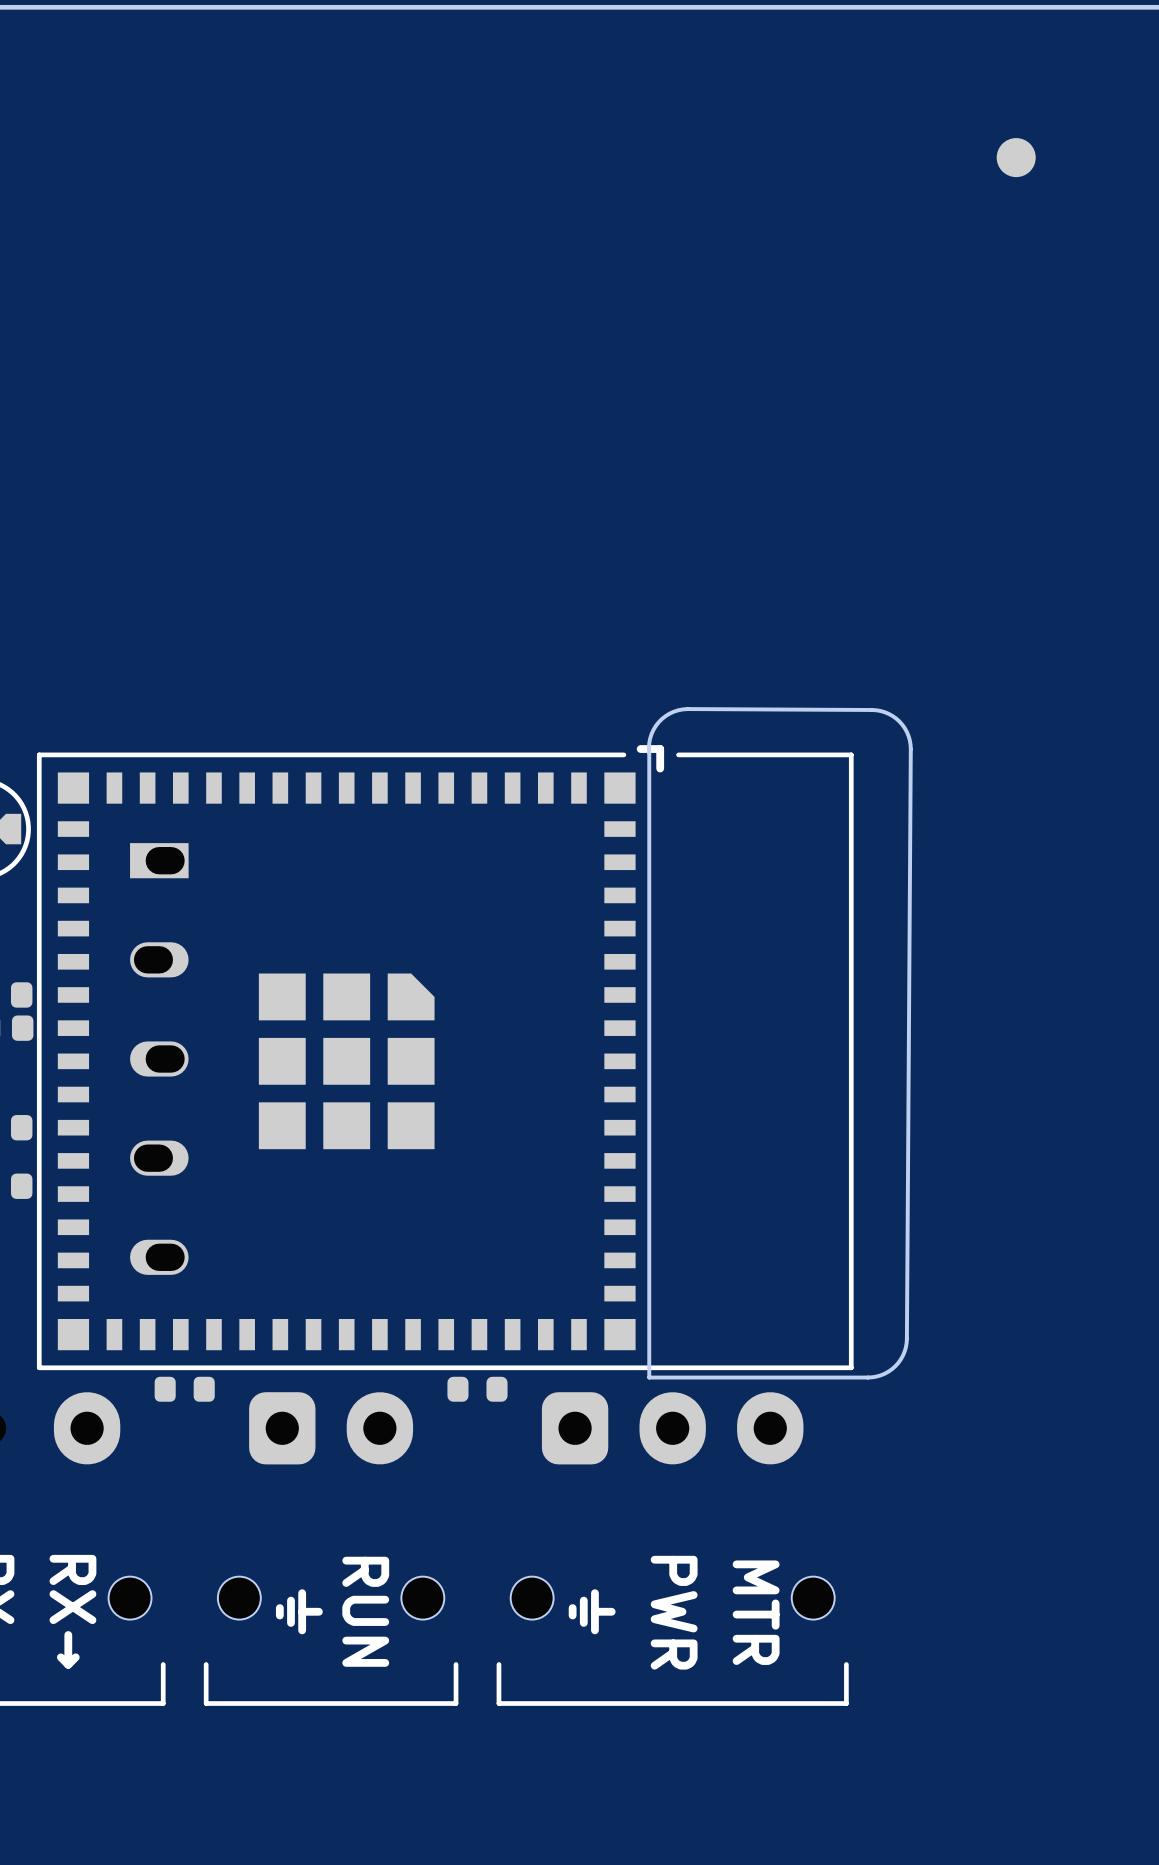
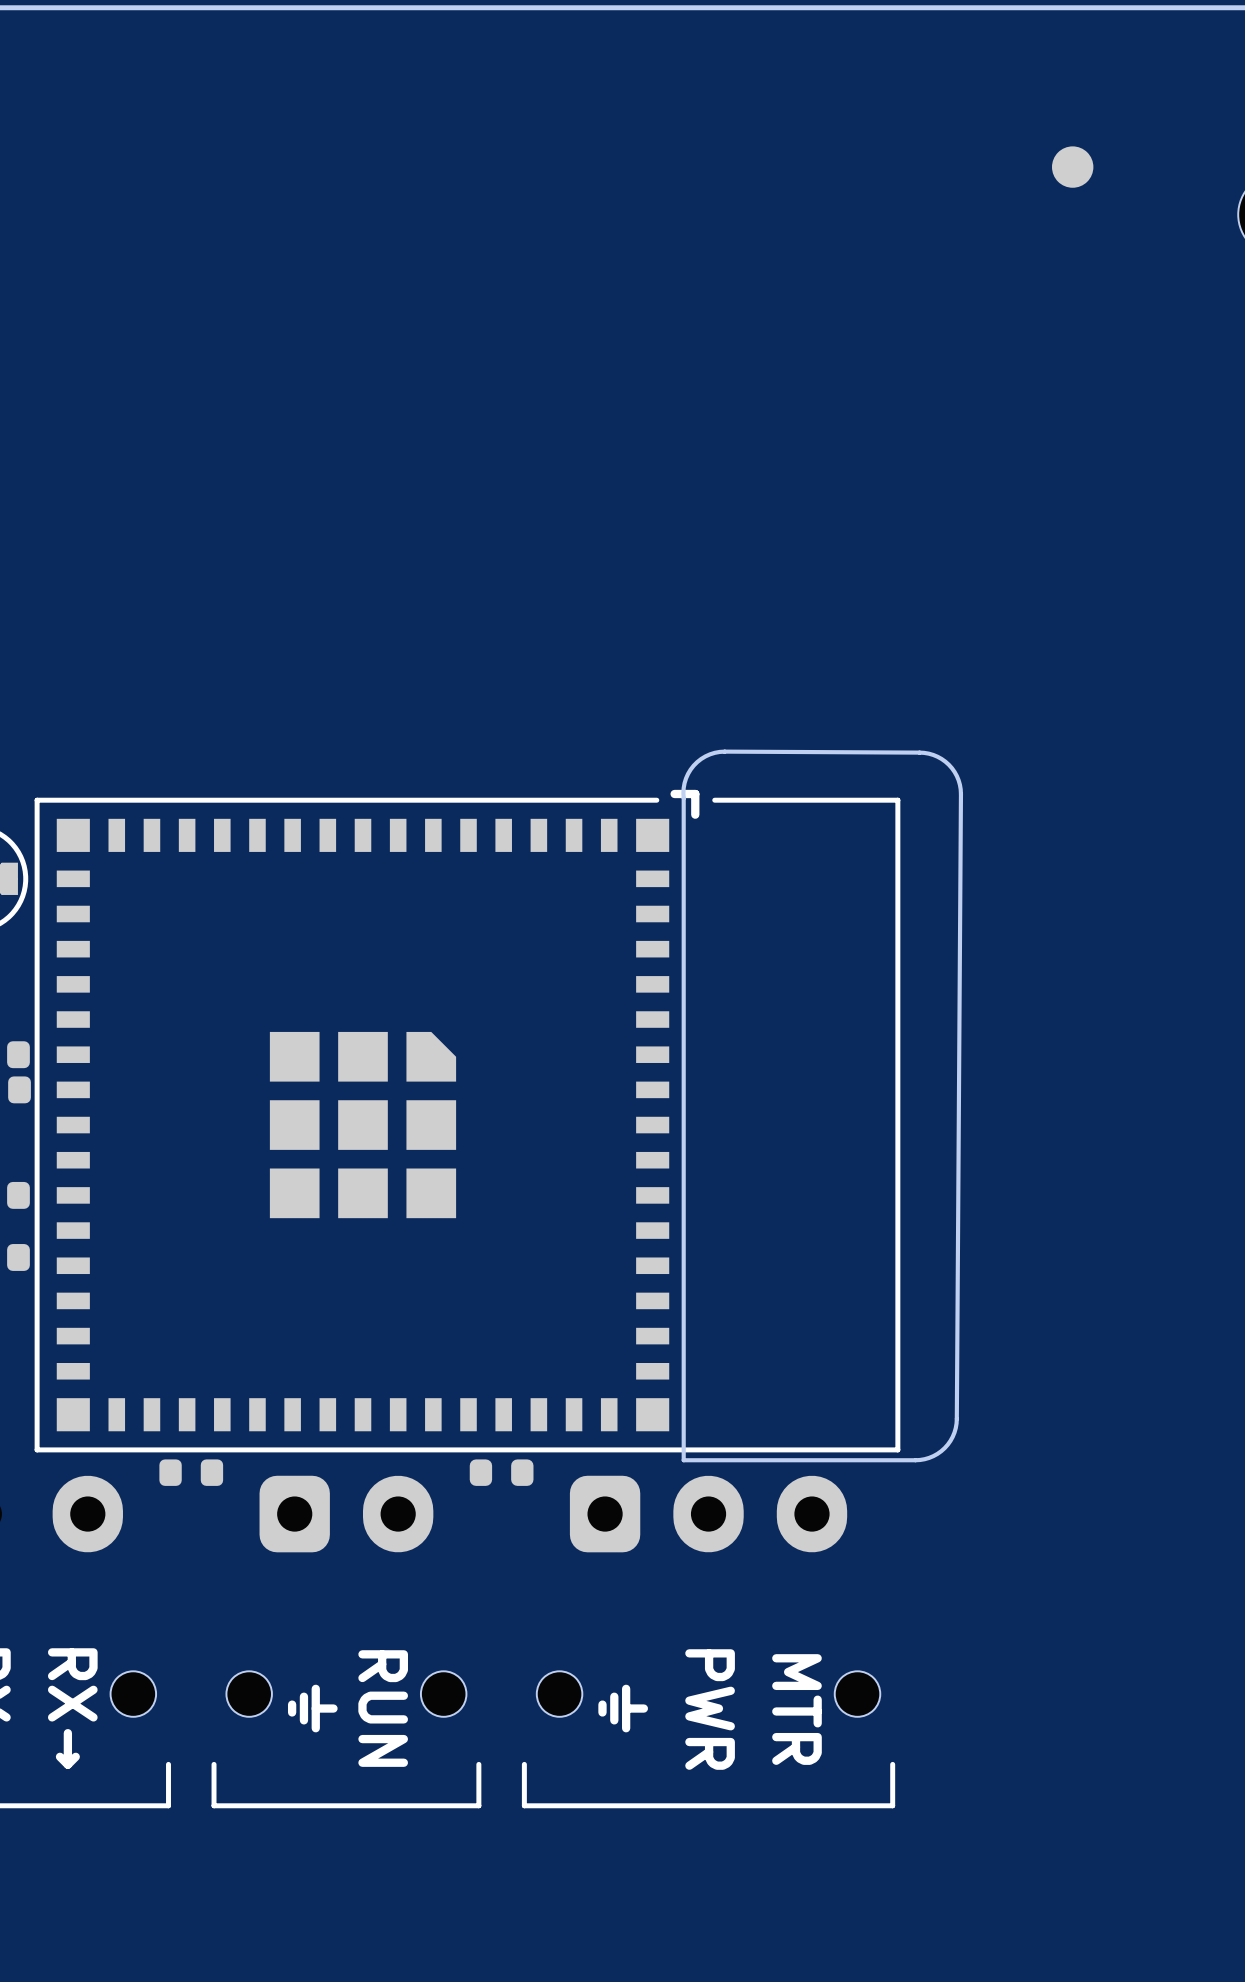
part: (159, 1058) -> none

